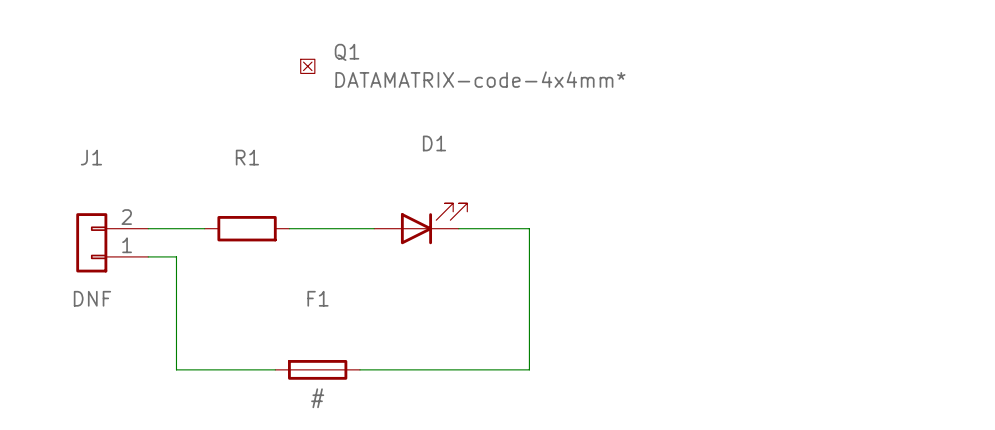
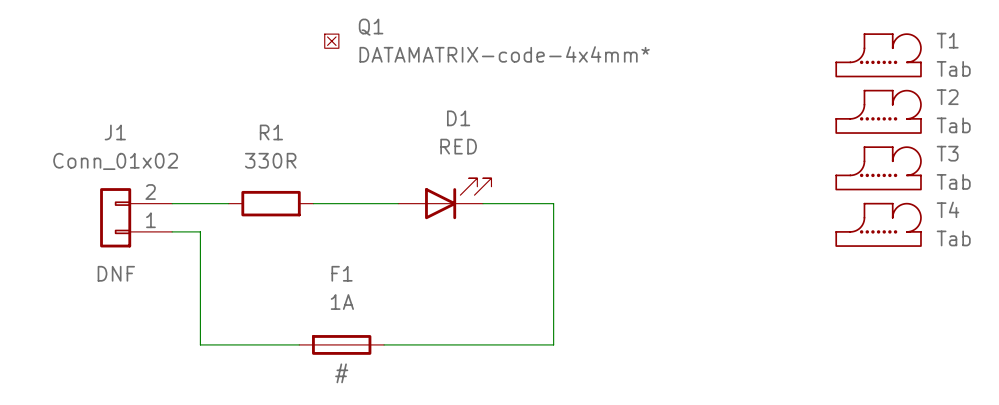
T1: none -> Tab (878, 55)
T2: none -> Tab (878, 111)
D1 value: none -> RED (458, 146)
R1 value: none -> 330R (270, 160)
J1 value: none -> Conn_01x02 (115, 161)
T3: none -> Tab (878, 168)
T4: none -> Tab (878, 224)
F1 value: none -> 1A (342, 302)

